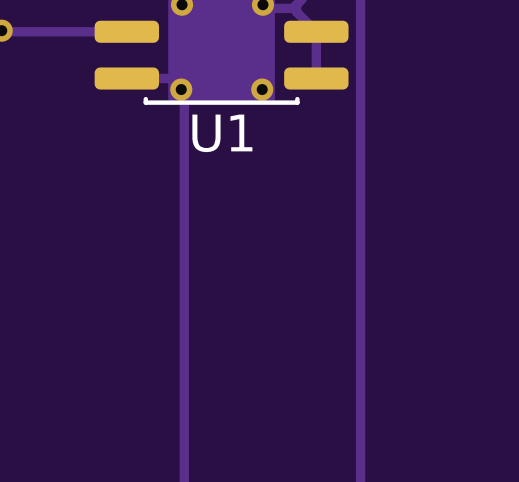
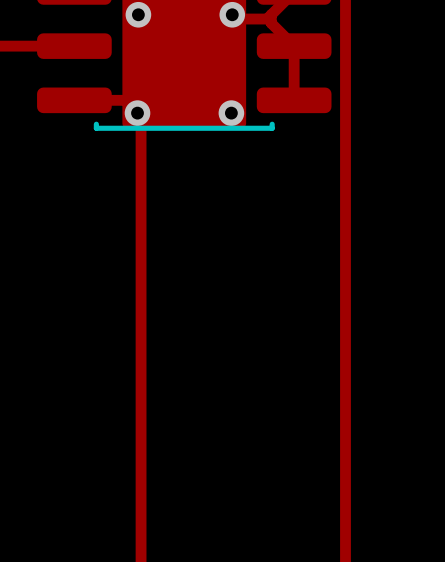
U1 name: U1 (222, 133) -> none

